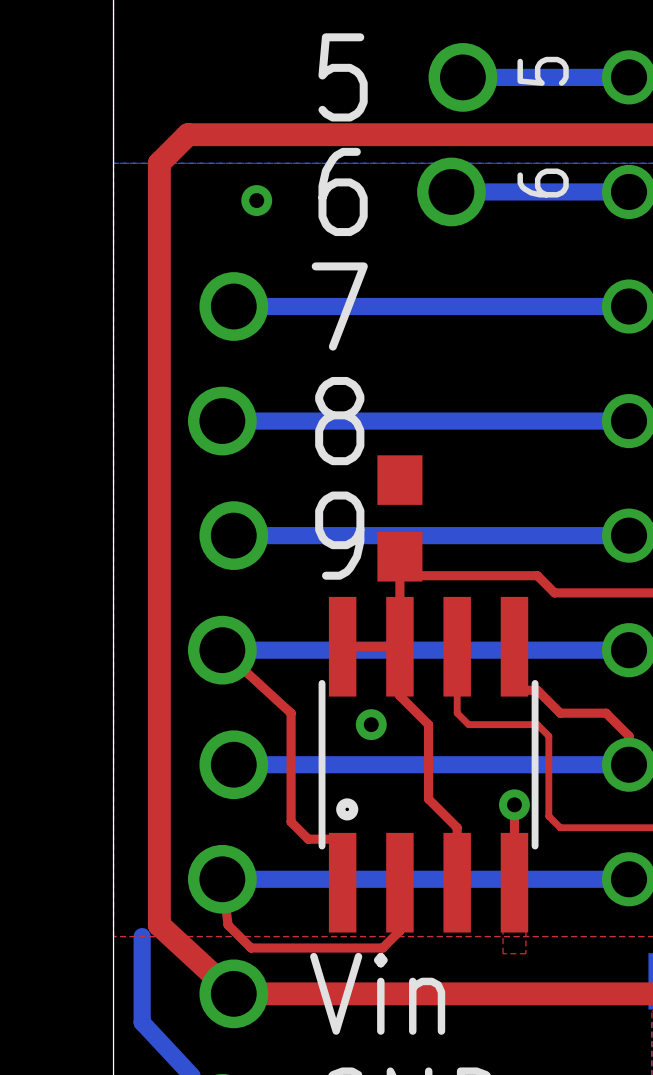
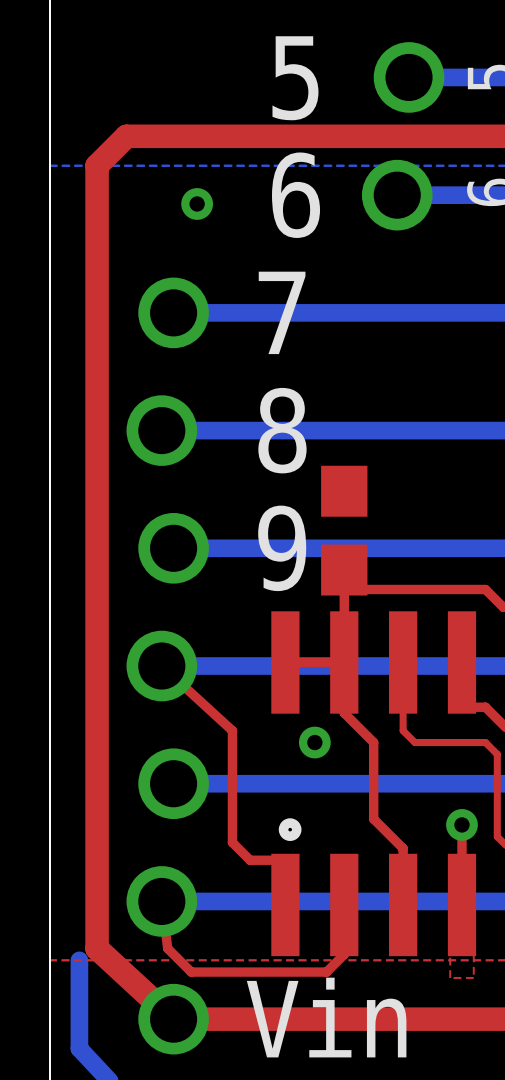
part footprint: [318, 596, 539, 933] -> [271, 611, 477, 957]

